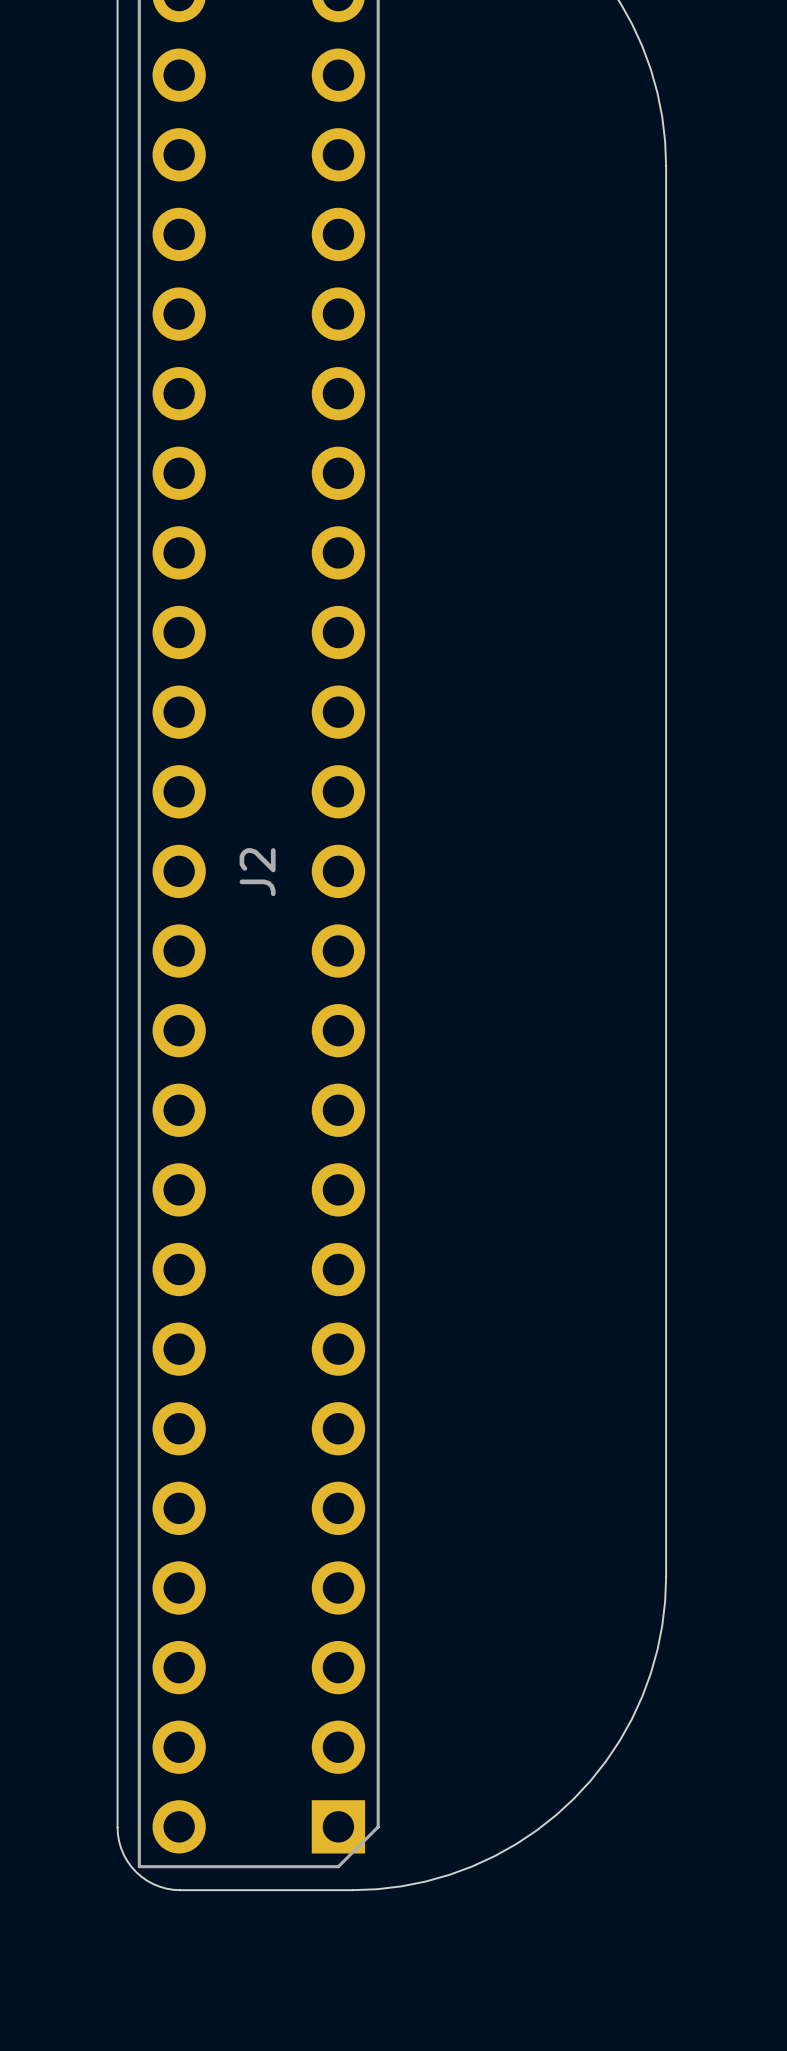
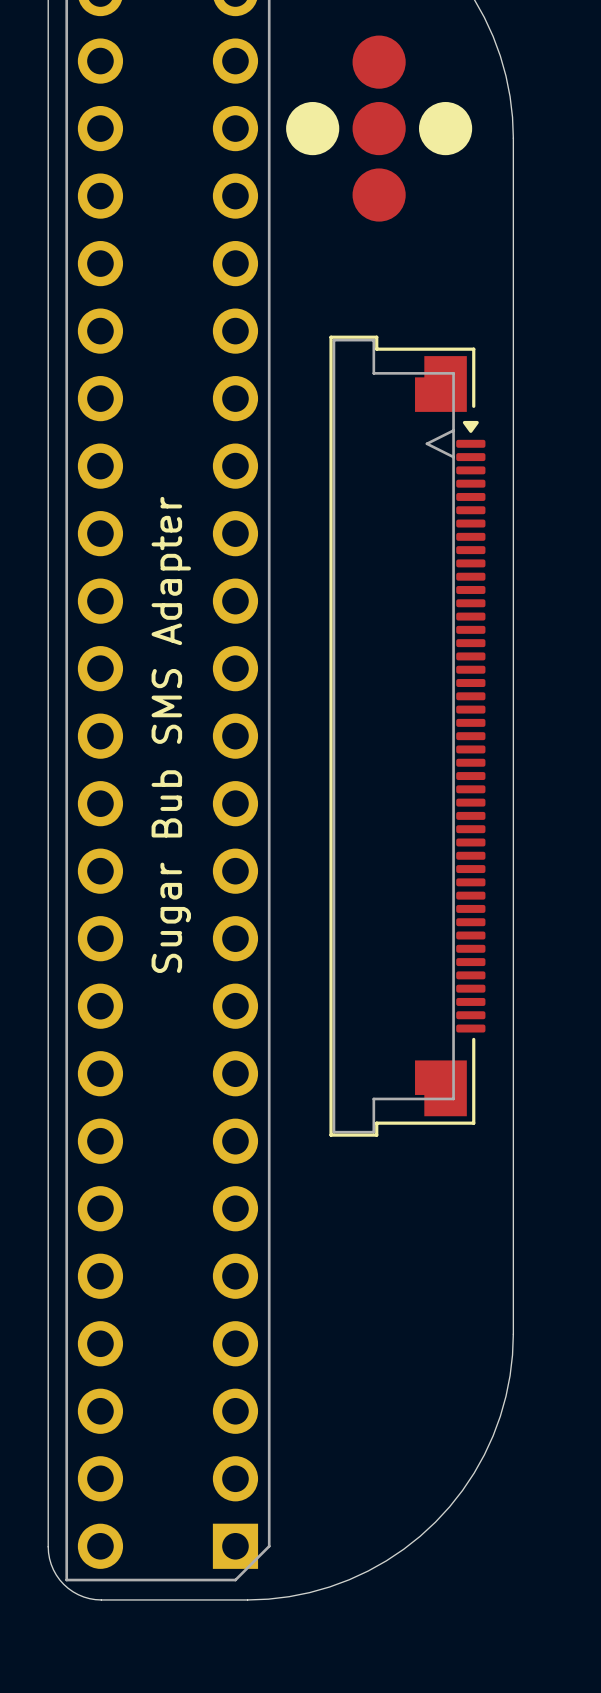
part: none -> (379, 128)
text: none -> Sugar Bub SMS Adapter (171, 734)
part: none -> (407, 736)
J2 name: J2 (257, 872) -> none

